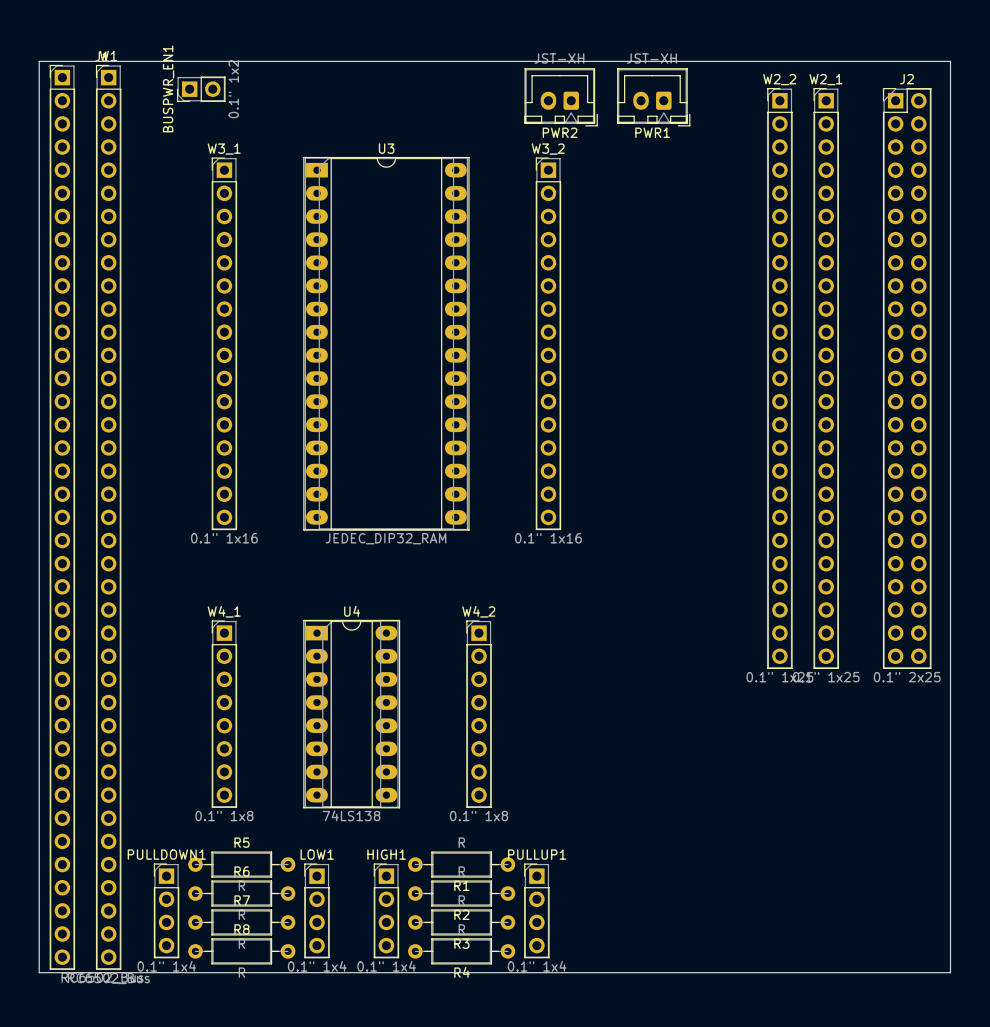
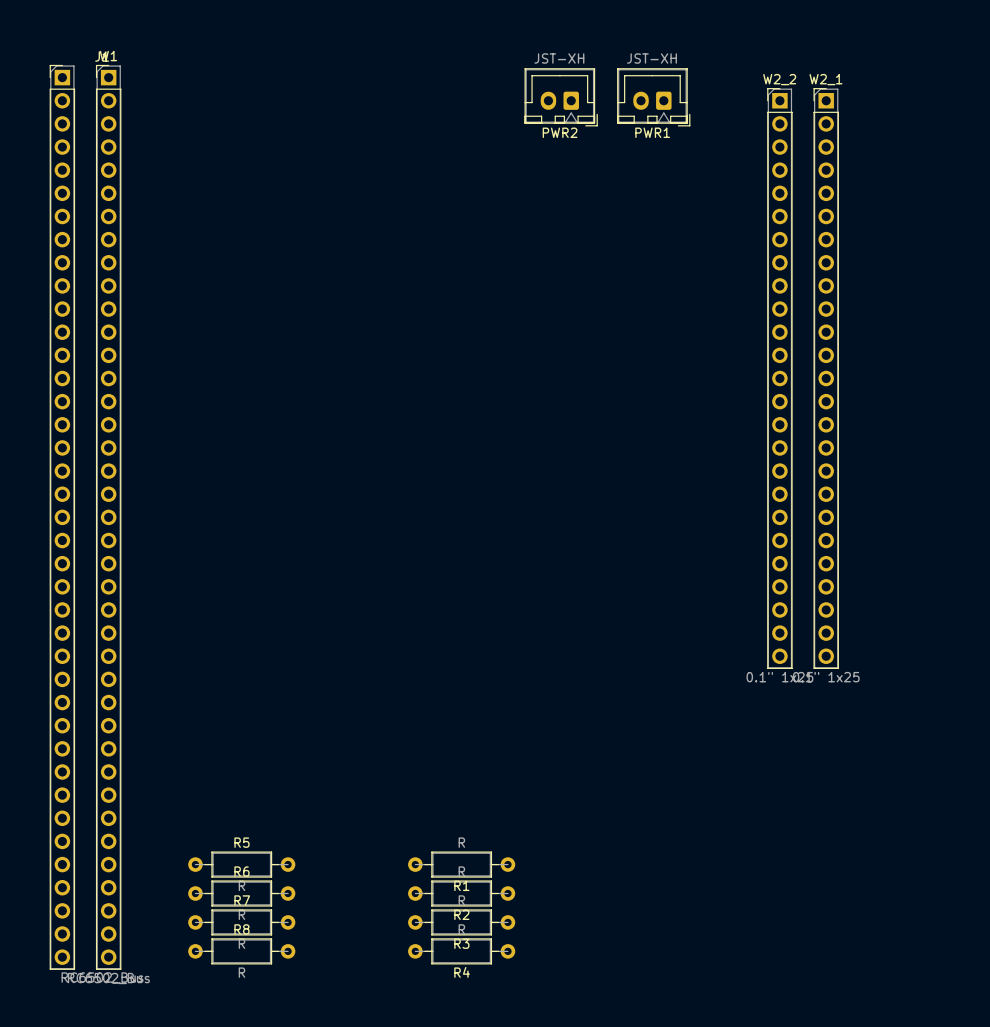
board edge: (39, 61) (39, 972) (950, 972) (950, 61) (39, 61) -> none
BUSPWR_EN1: 0.1" 1x2 (201, 89) -> none
W3_1: 0.1" 1x16 (224, 343) -> none
U3: JEDEC_DIP32_RAM (386, 343) -> none
W3_2: 0.1" 1x16 (548, 343) -> none
J2: 0.1" 2x25 (907, 378) -> none
W4_1: 0.1" 1x8 (224, 714) -> none
U4: 74LS138 (351, 714) -> none
W4_2: 0.1" 1x8 (479, 714) -> none
PULLDOWN1: 0.1" 1x4 (166, 910) -> none
LOW1: 0.1" 1x4 (316, 910) -> none
HIGH1: 0.1" 1x4 (386, 910) -> none
PULLUP1: 0.1" 1x4 (536, 910) -> none

